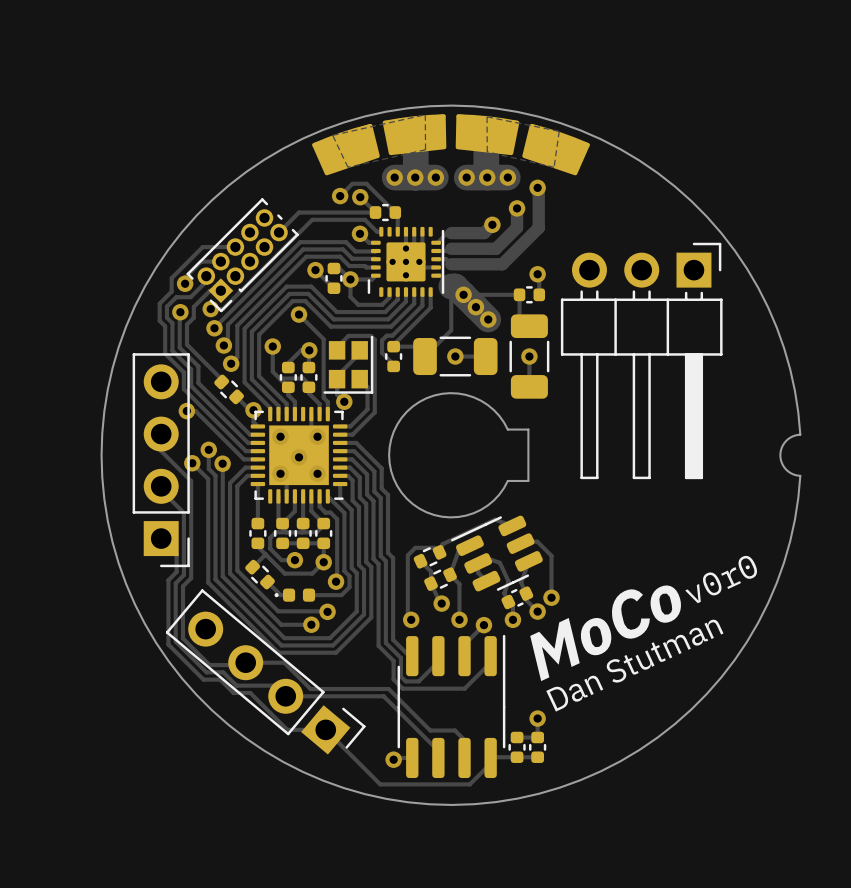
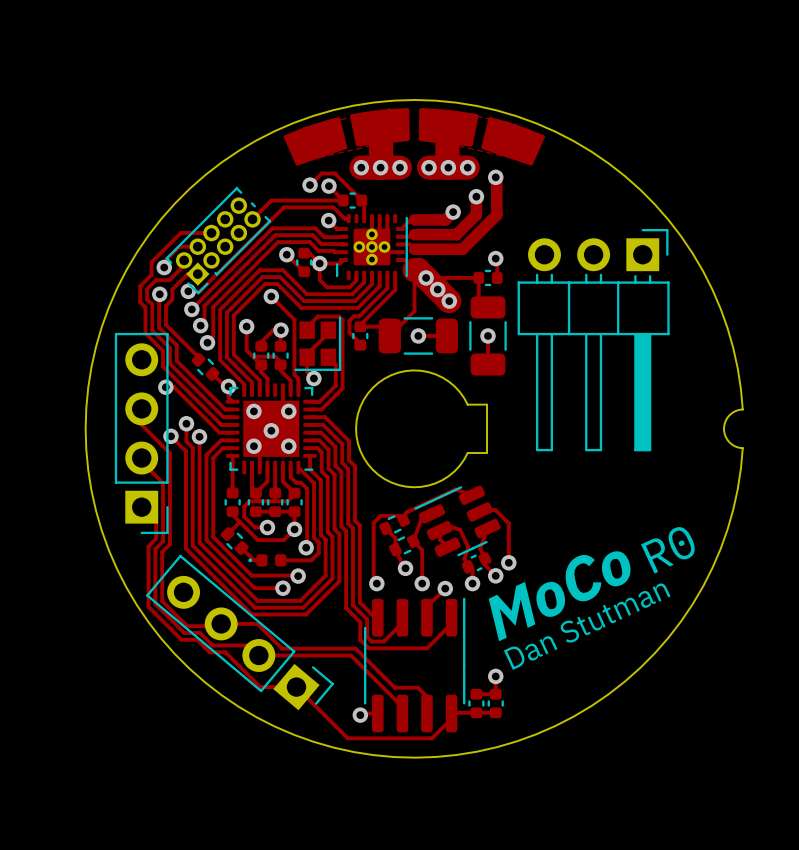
drawing shape: [685, 555, 757, 604] -> [641, 527, 695, 574]

